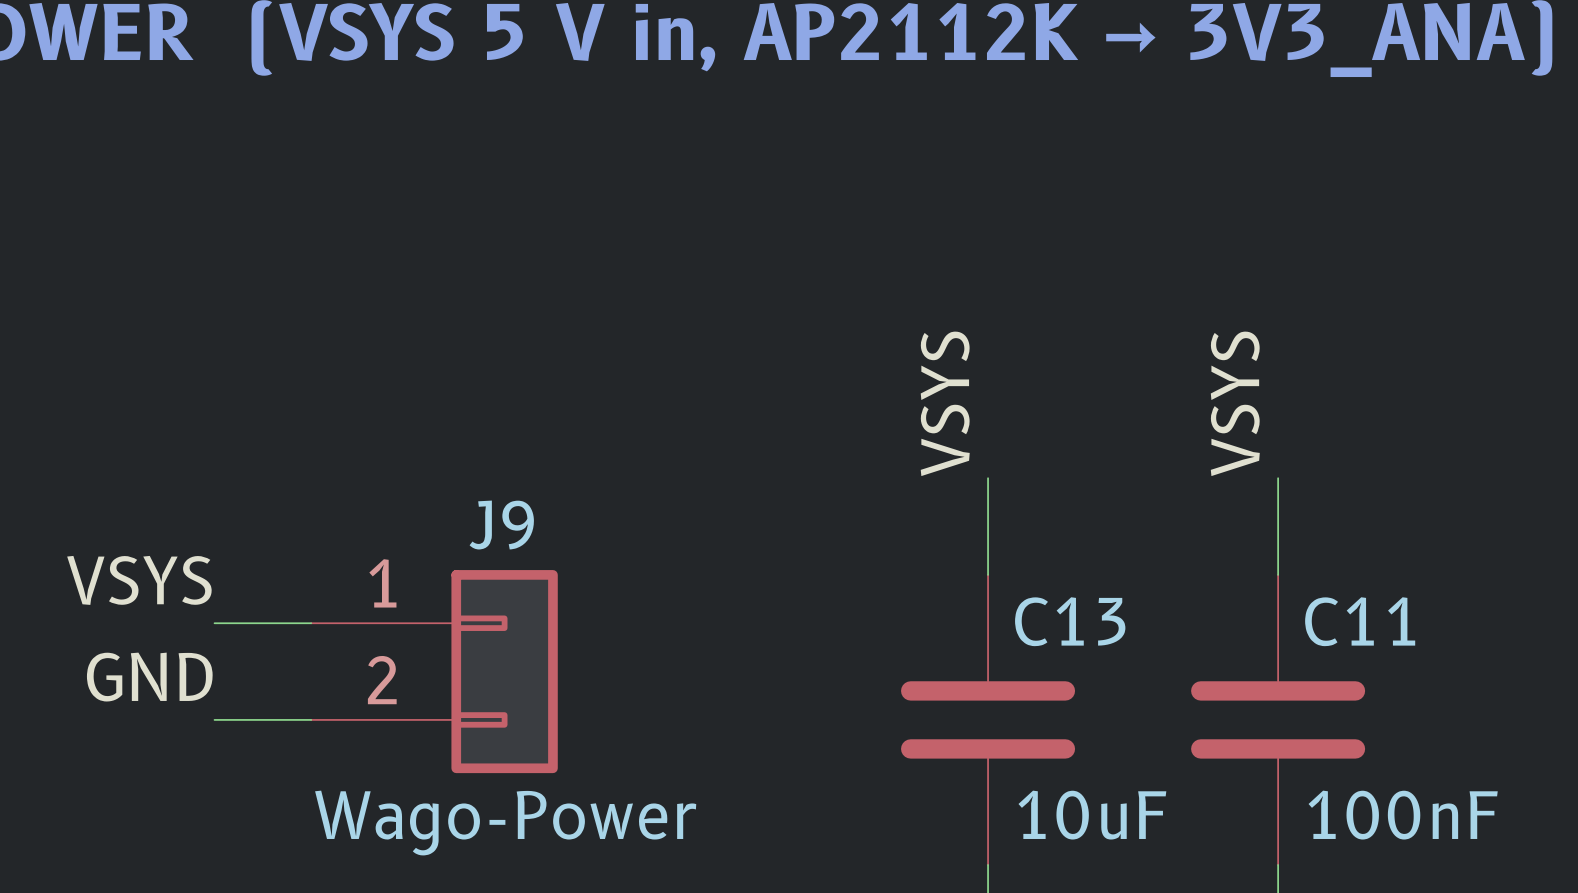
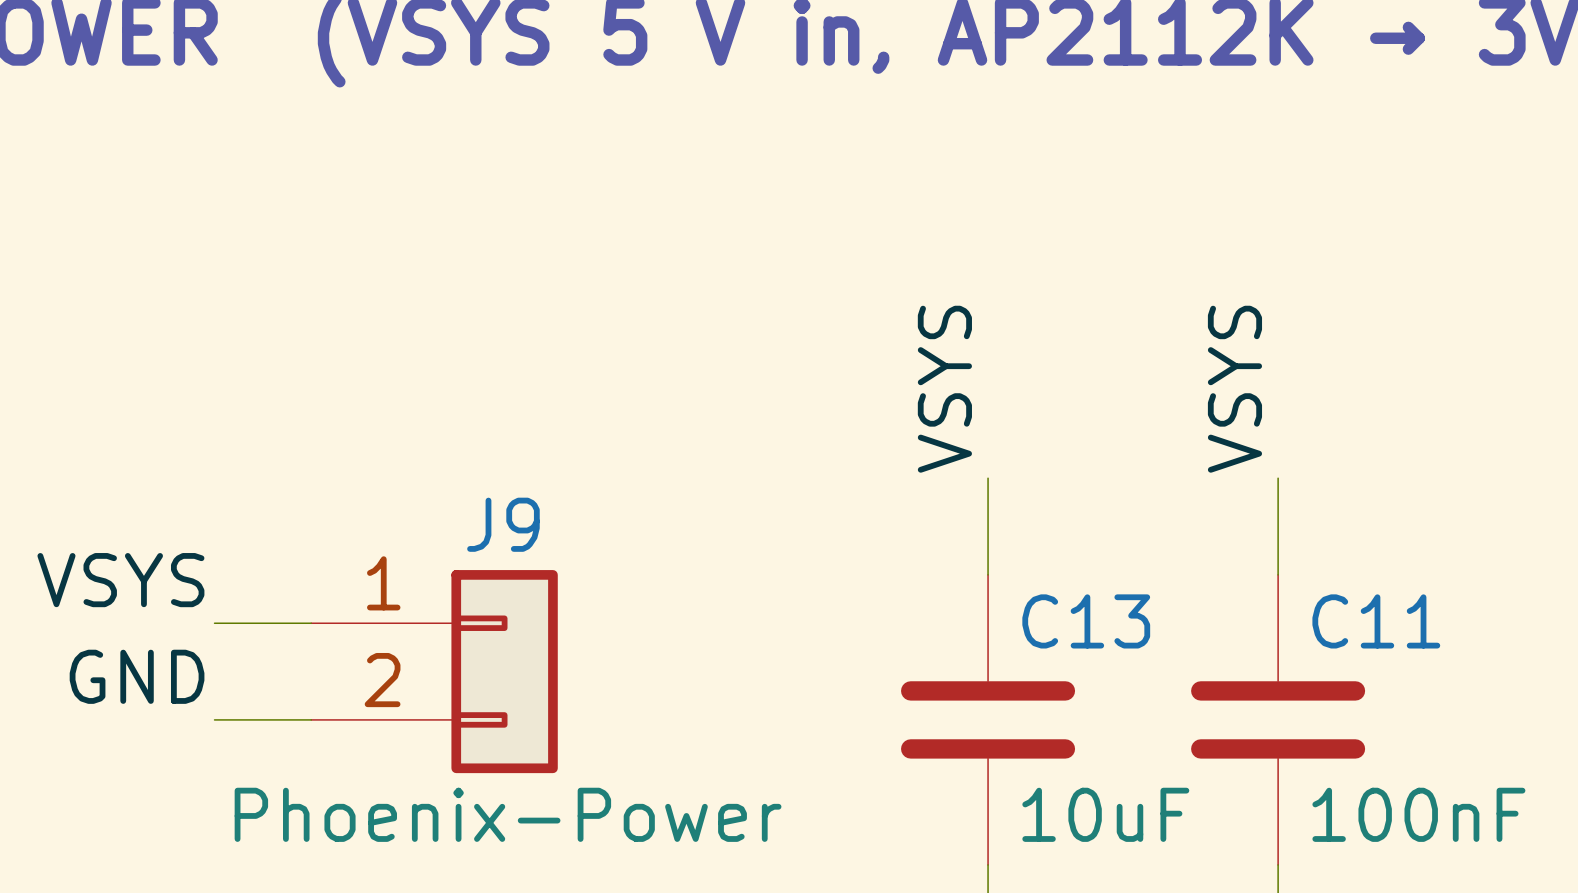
J9 value: Wago-Power (505, 823) -> Phoenix-Power (508, 814)

